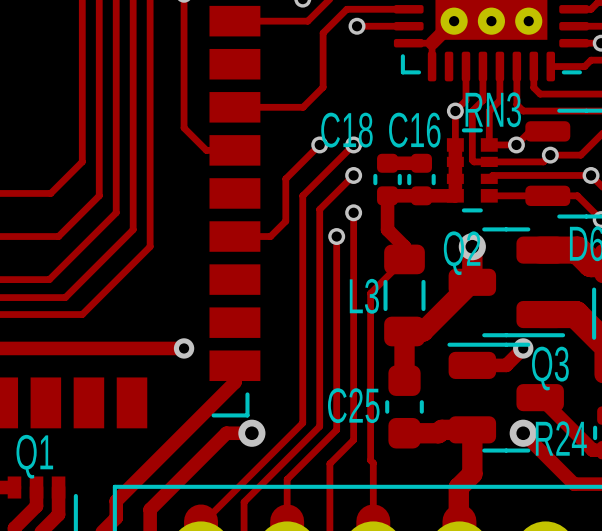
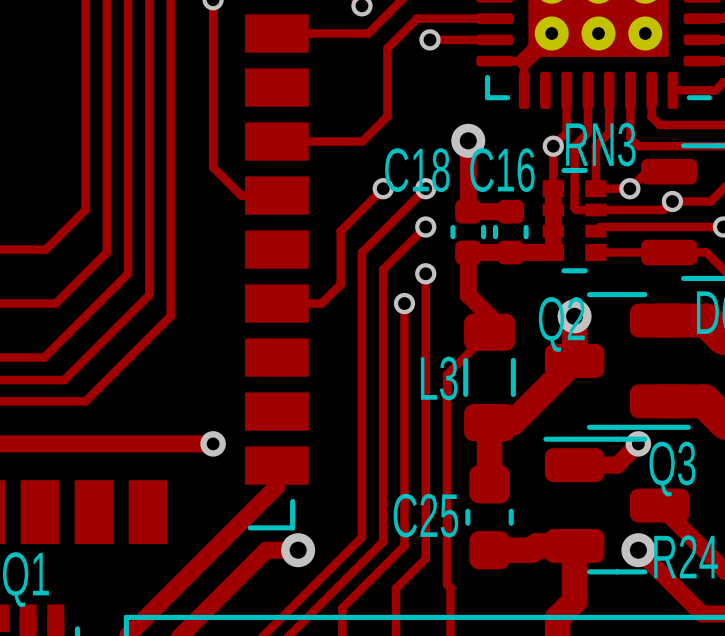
track: none -> (468, 140) (468, 211)
via: none -> (468, 140)

